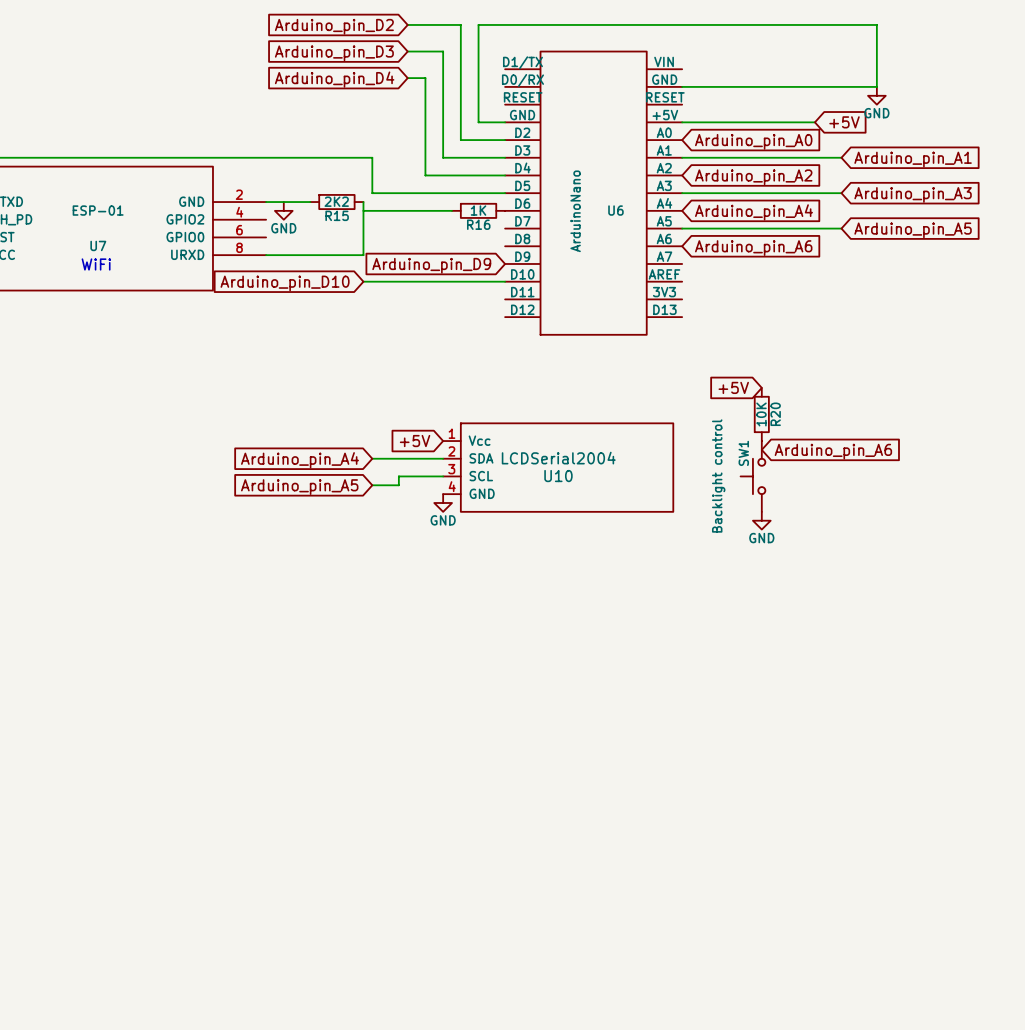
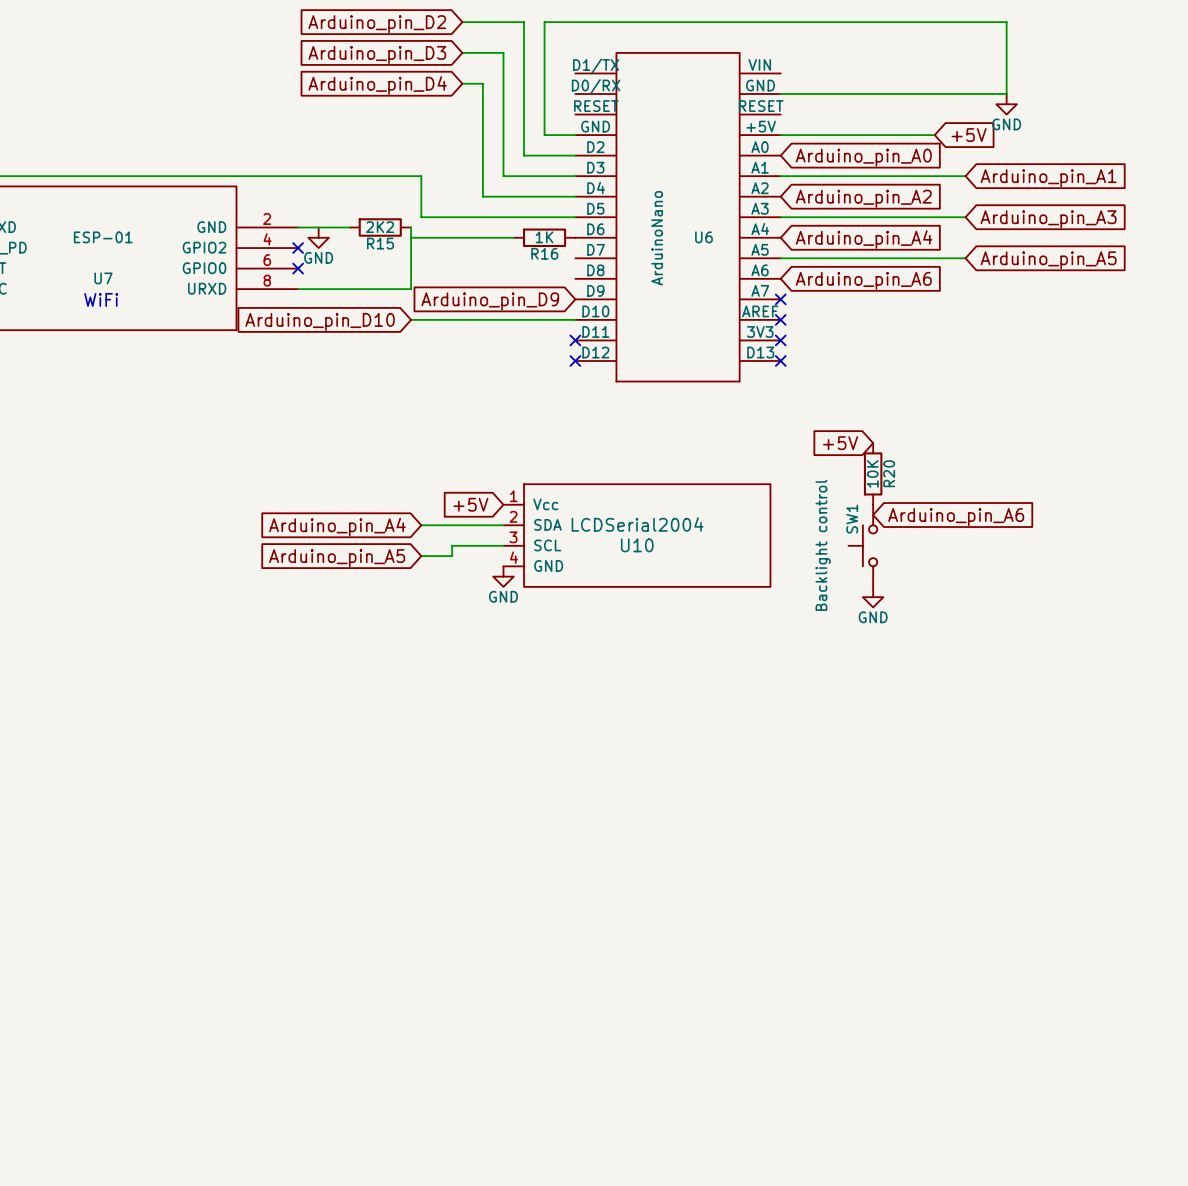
no-connect mark: none -> (298, 248)
no-connect mark: none -> (298, 268)
no-connect mark: none -> (780, 299)
no-connect mark: none -> (780, 319)
no-connect mark: none -> (575, 340)
no-connect mark: none -> (780, 340)
no-connect mark: none -> (575, 360)
no-connect mark: none -> (780, 360)

